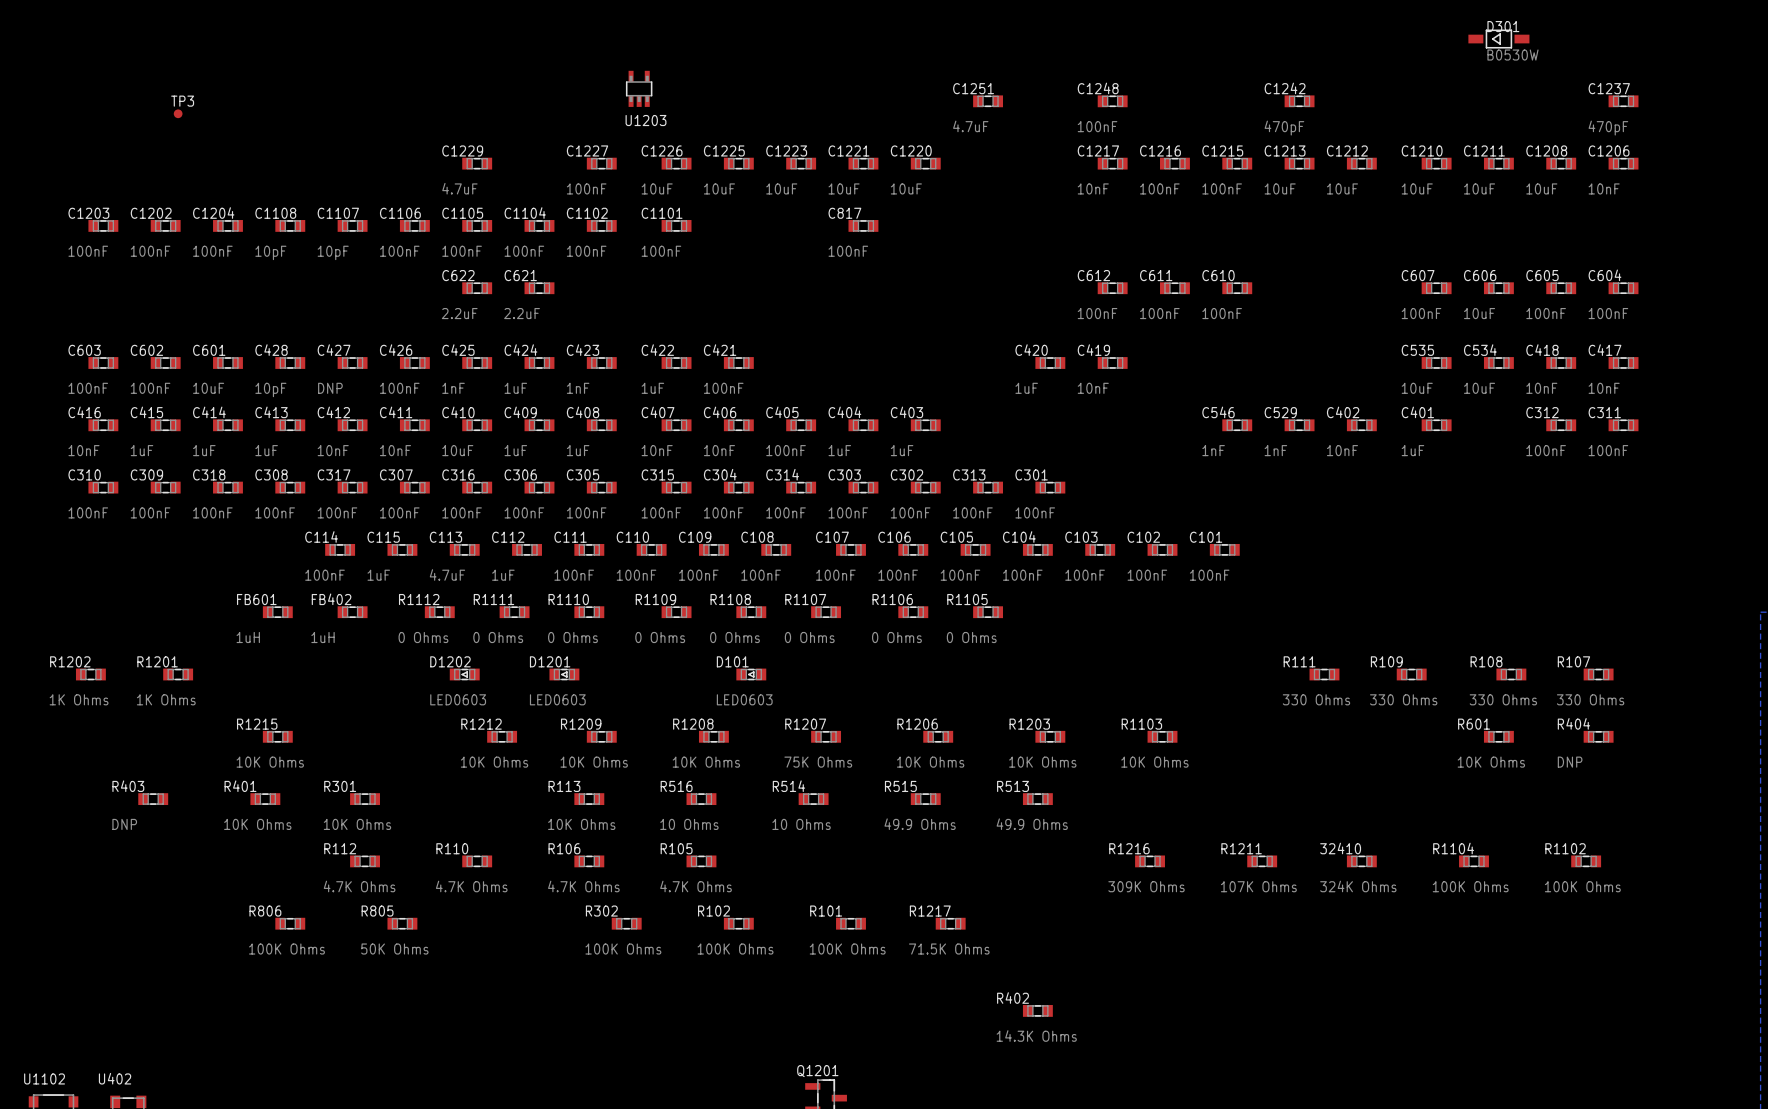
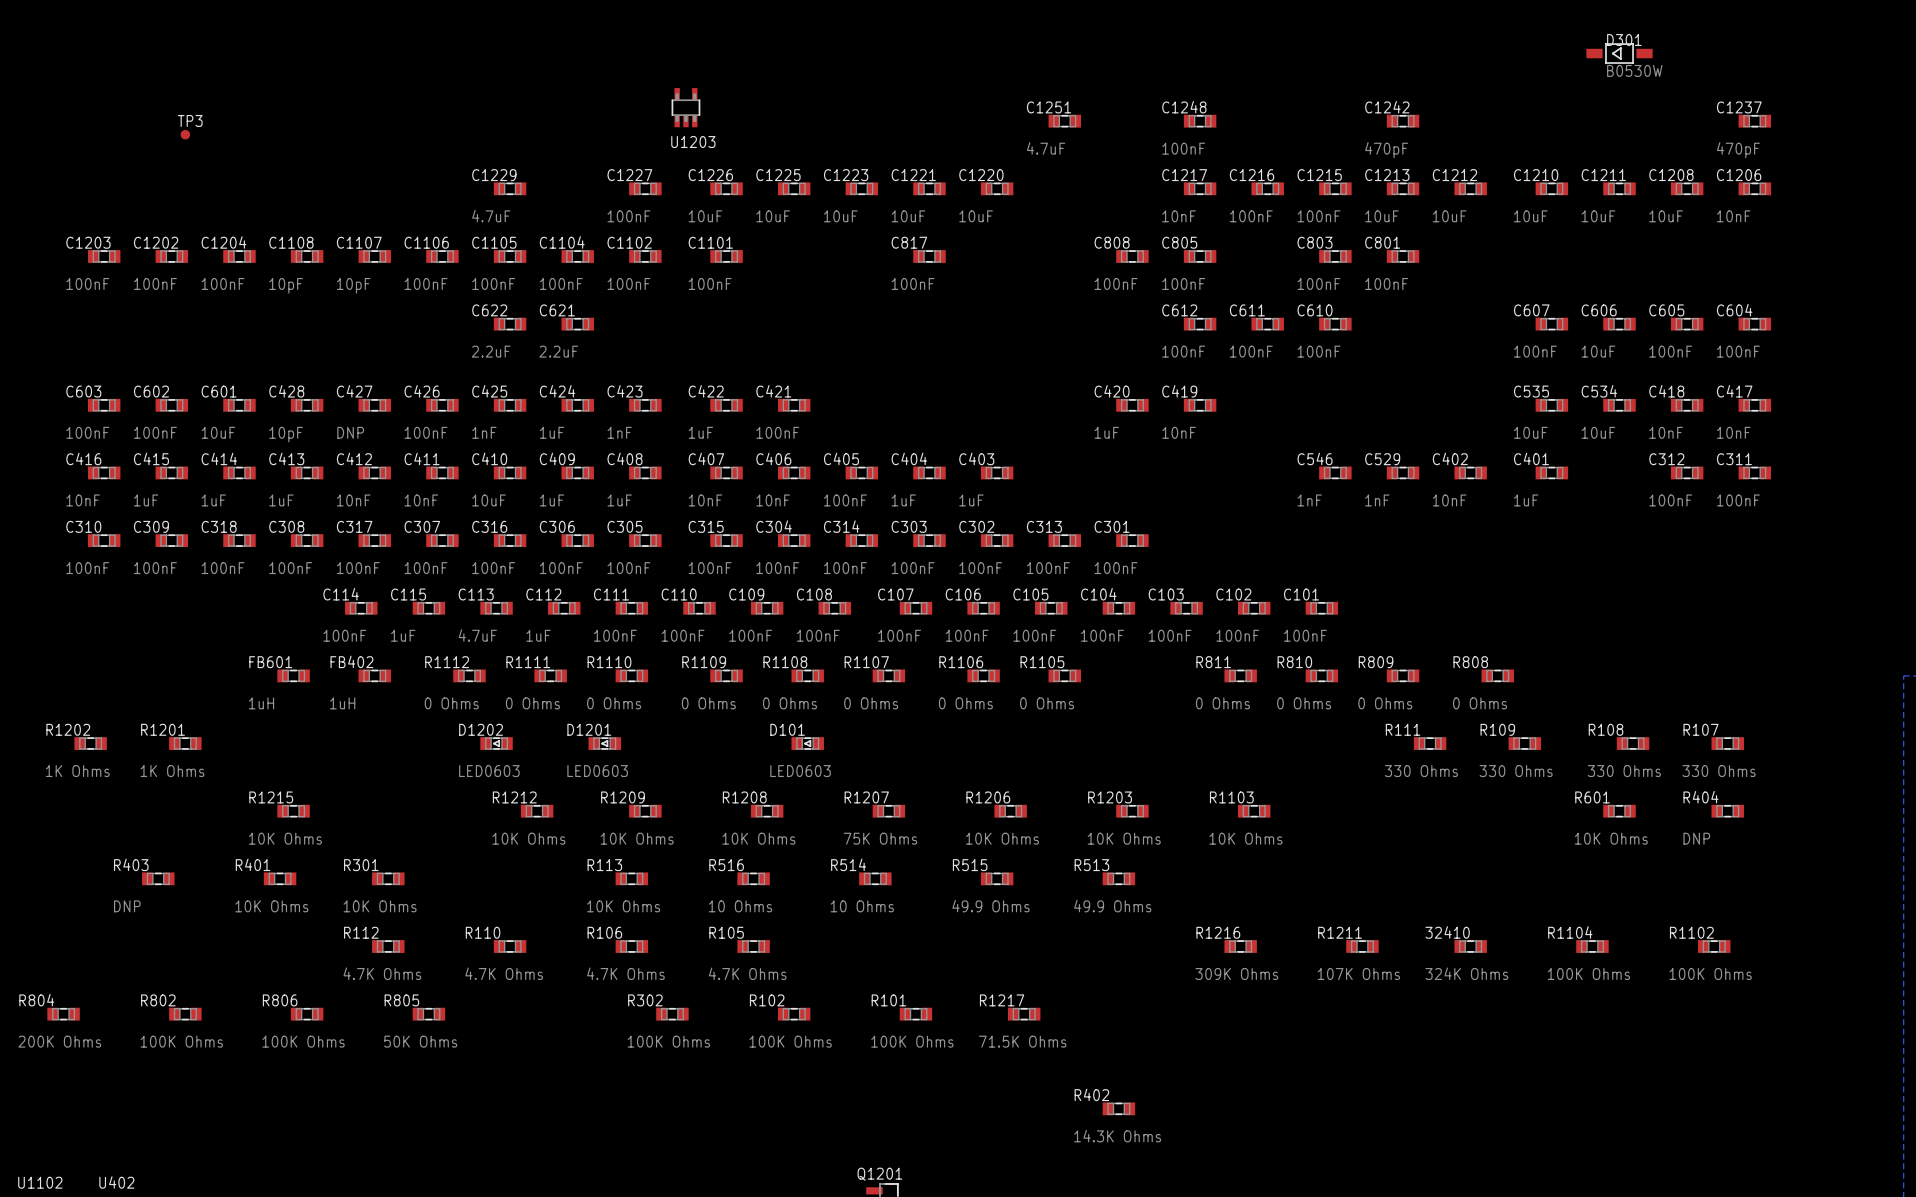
C808: none -> 100nF (1132, 256)
C805: none -> 100nF (1200, 256)
C803: none -> 100nF (1335, 256)
C801: none -> 100nF (1403, 256)
R811: none -> 0 Ohms (1240, 675)
R810: none -> 0 Ohms (1321, 675)
R809: none -> 0 Ohms (1403, 675)
R808: none -> 0 Ohms (1497, 675)
R804: none -> 200K Ohms (63, 1014)
R802: none -> 100K Ohms (185, 1014)

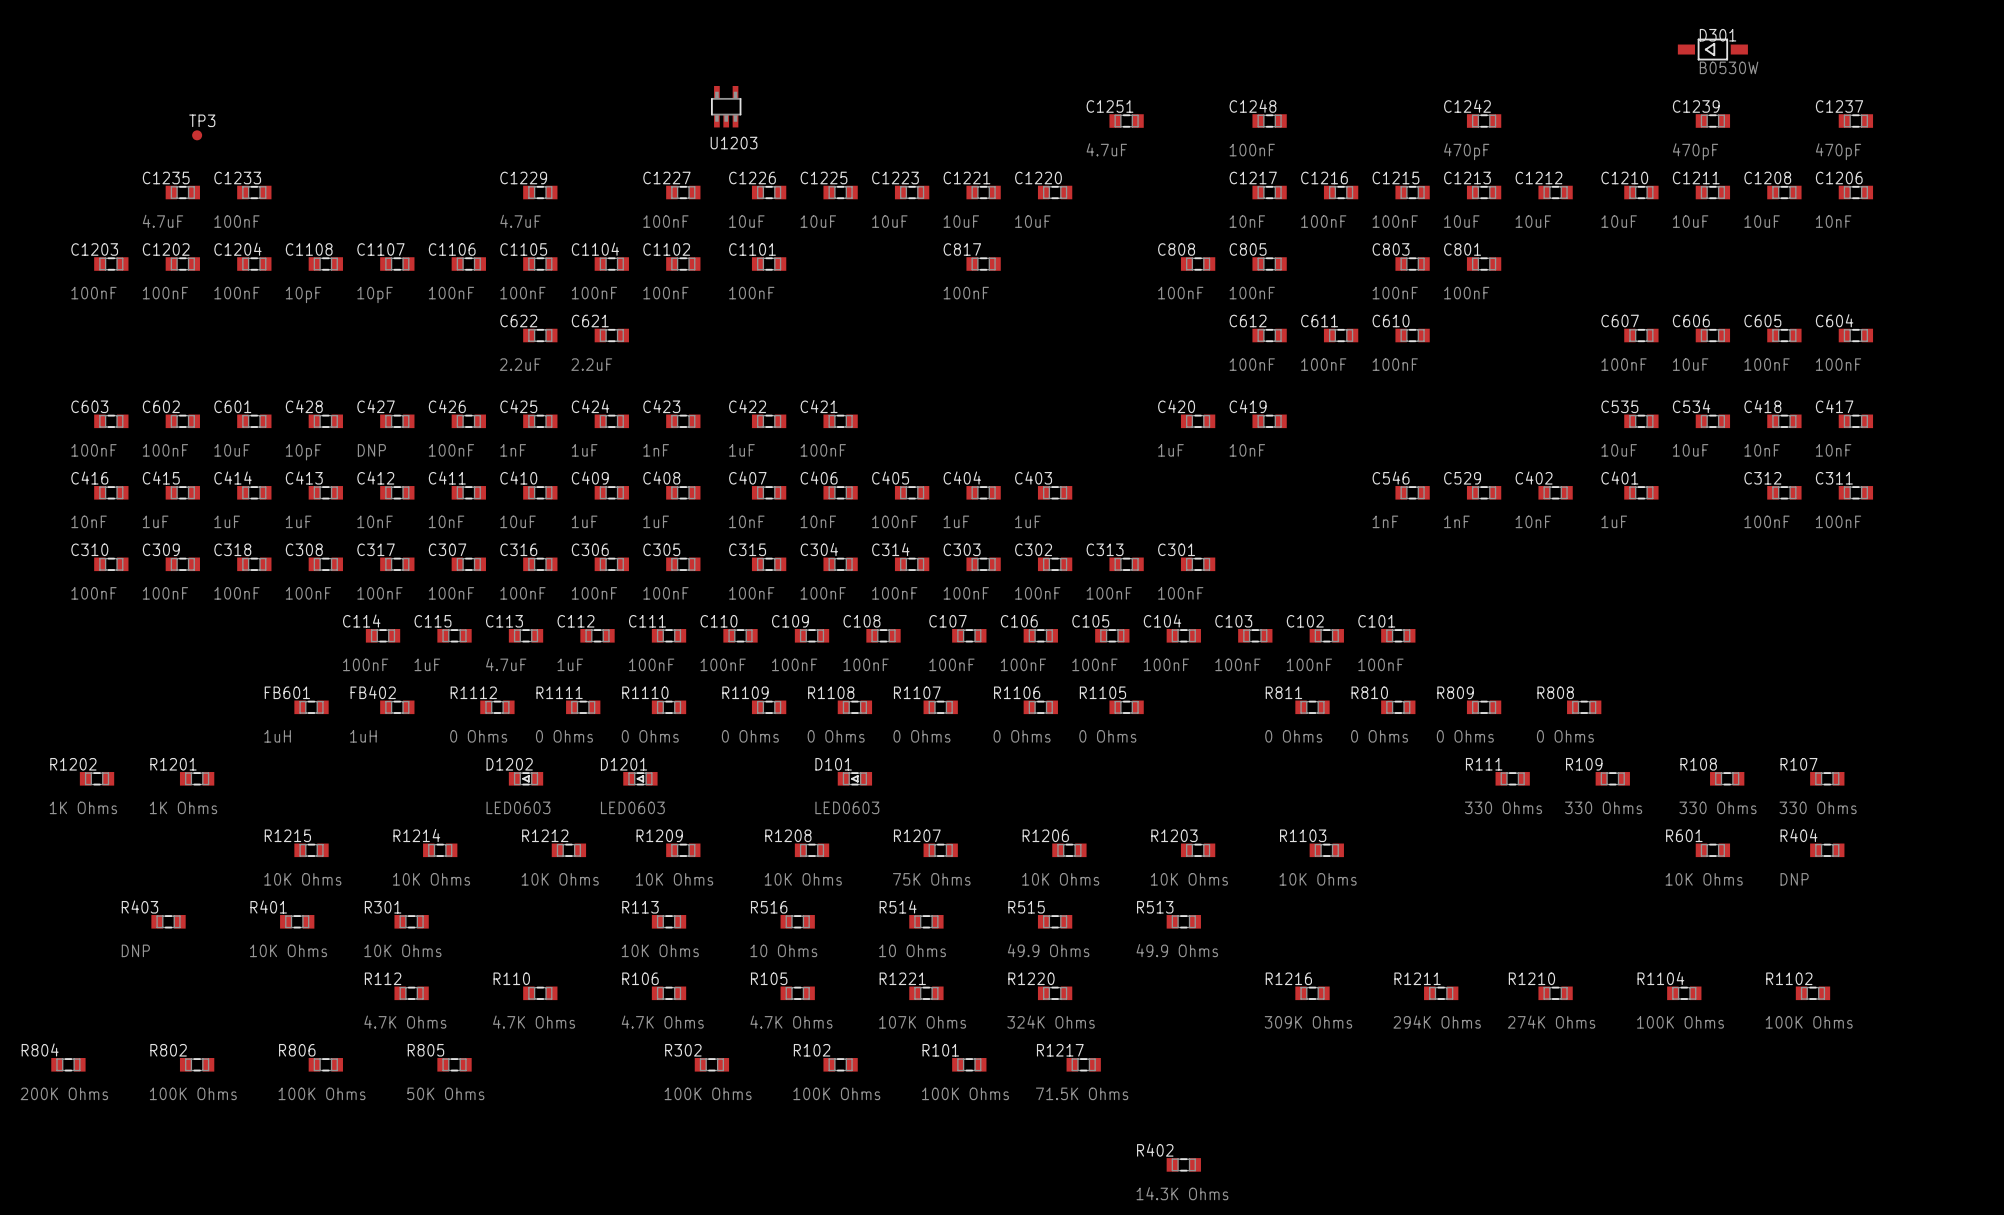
C1239: none -> 470pF (1712, 121)
C1235: none -> 4.7uF (182, 192)
C1233: none -> 100nF (254, 192)
R1214: none -> 10K Ohms (440, 850)
32410 name: 32410 (1447, 932) -> R1210 (1531, 978)
R1221: none -> 107K Ohms (926, 993)
R1220: none -> 324K Ohms (1055, 993)
R1211 value: 107K Ohms (1358, 973) -> 294K Ohms (1437, 1022)
32410 value: 324K Ohms (1466, 973) -> 274K Ohms (1551, 1022)

